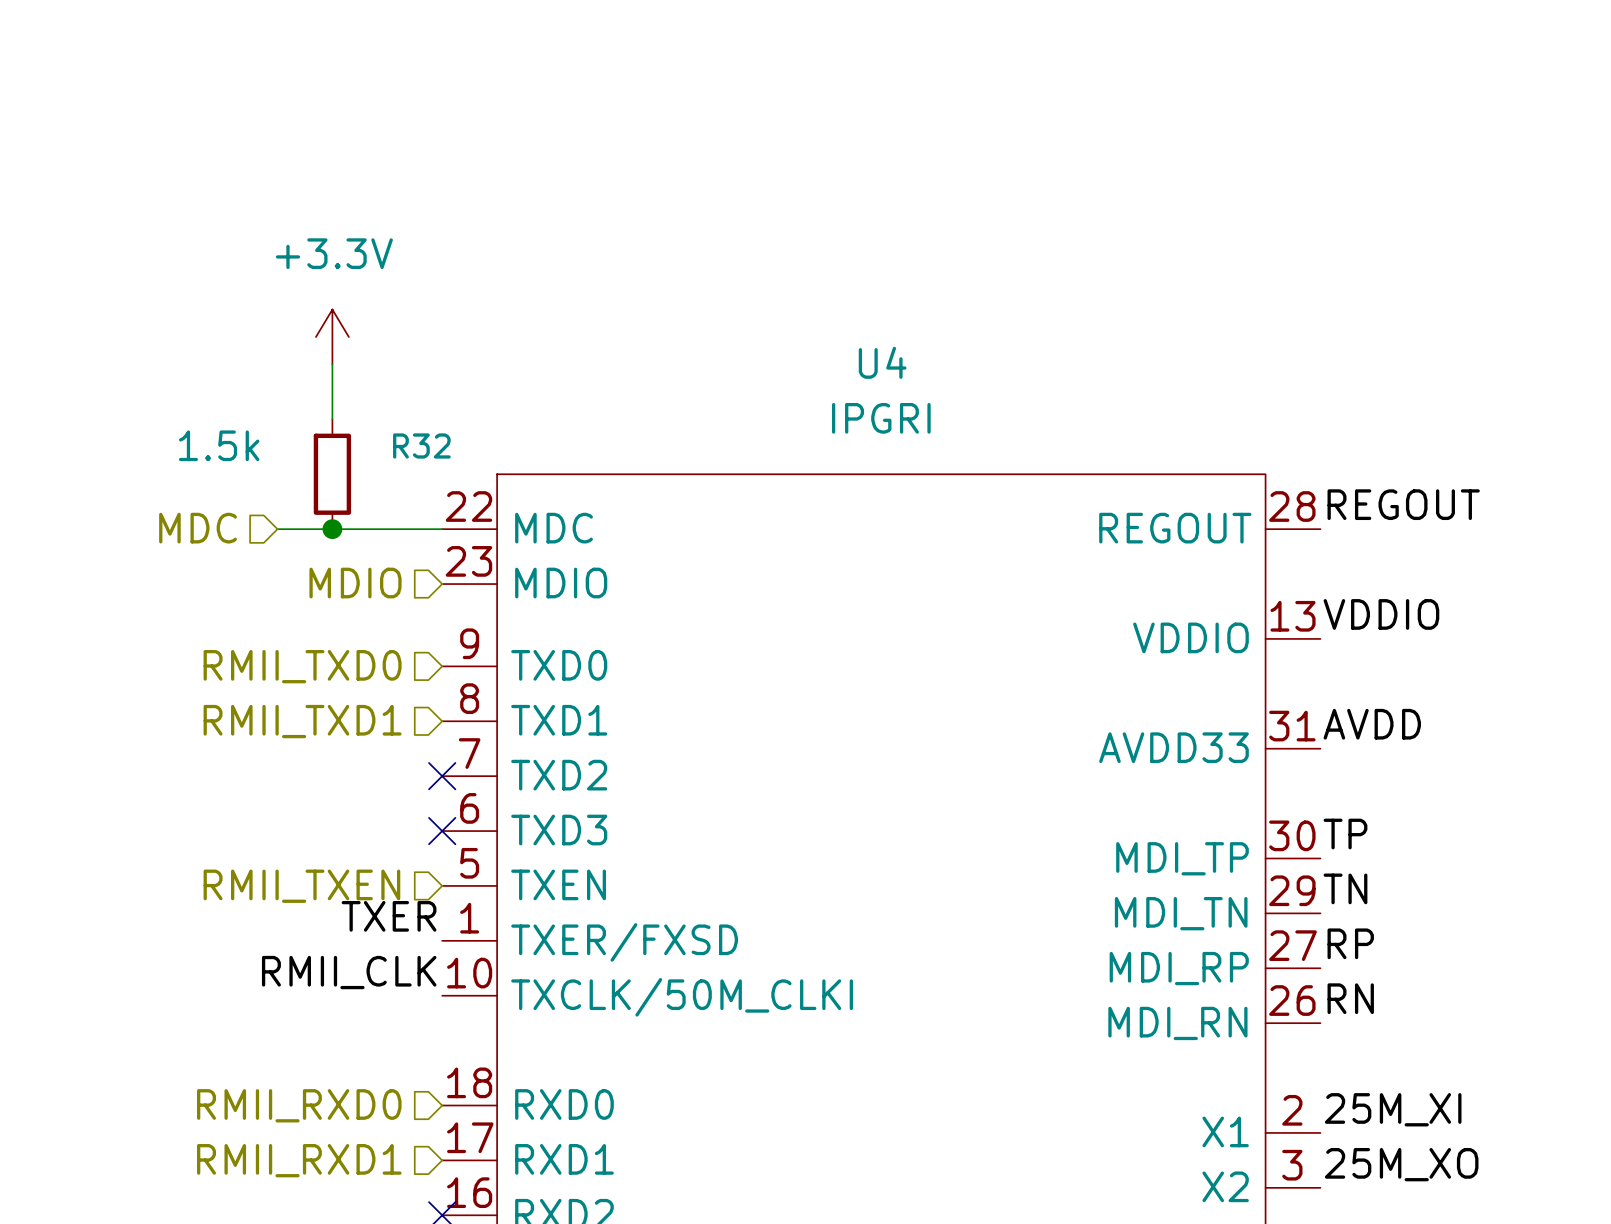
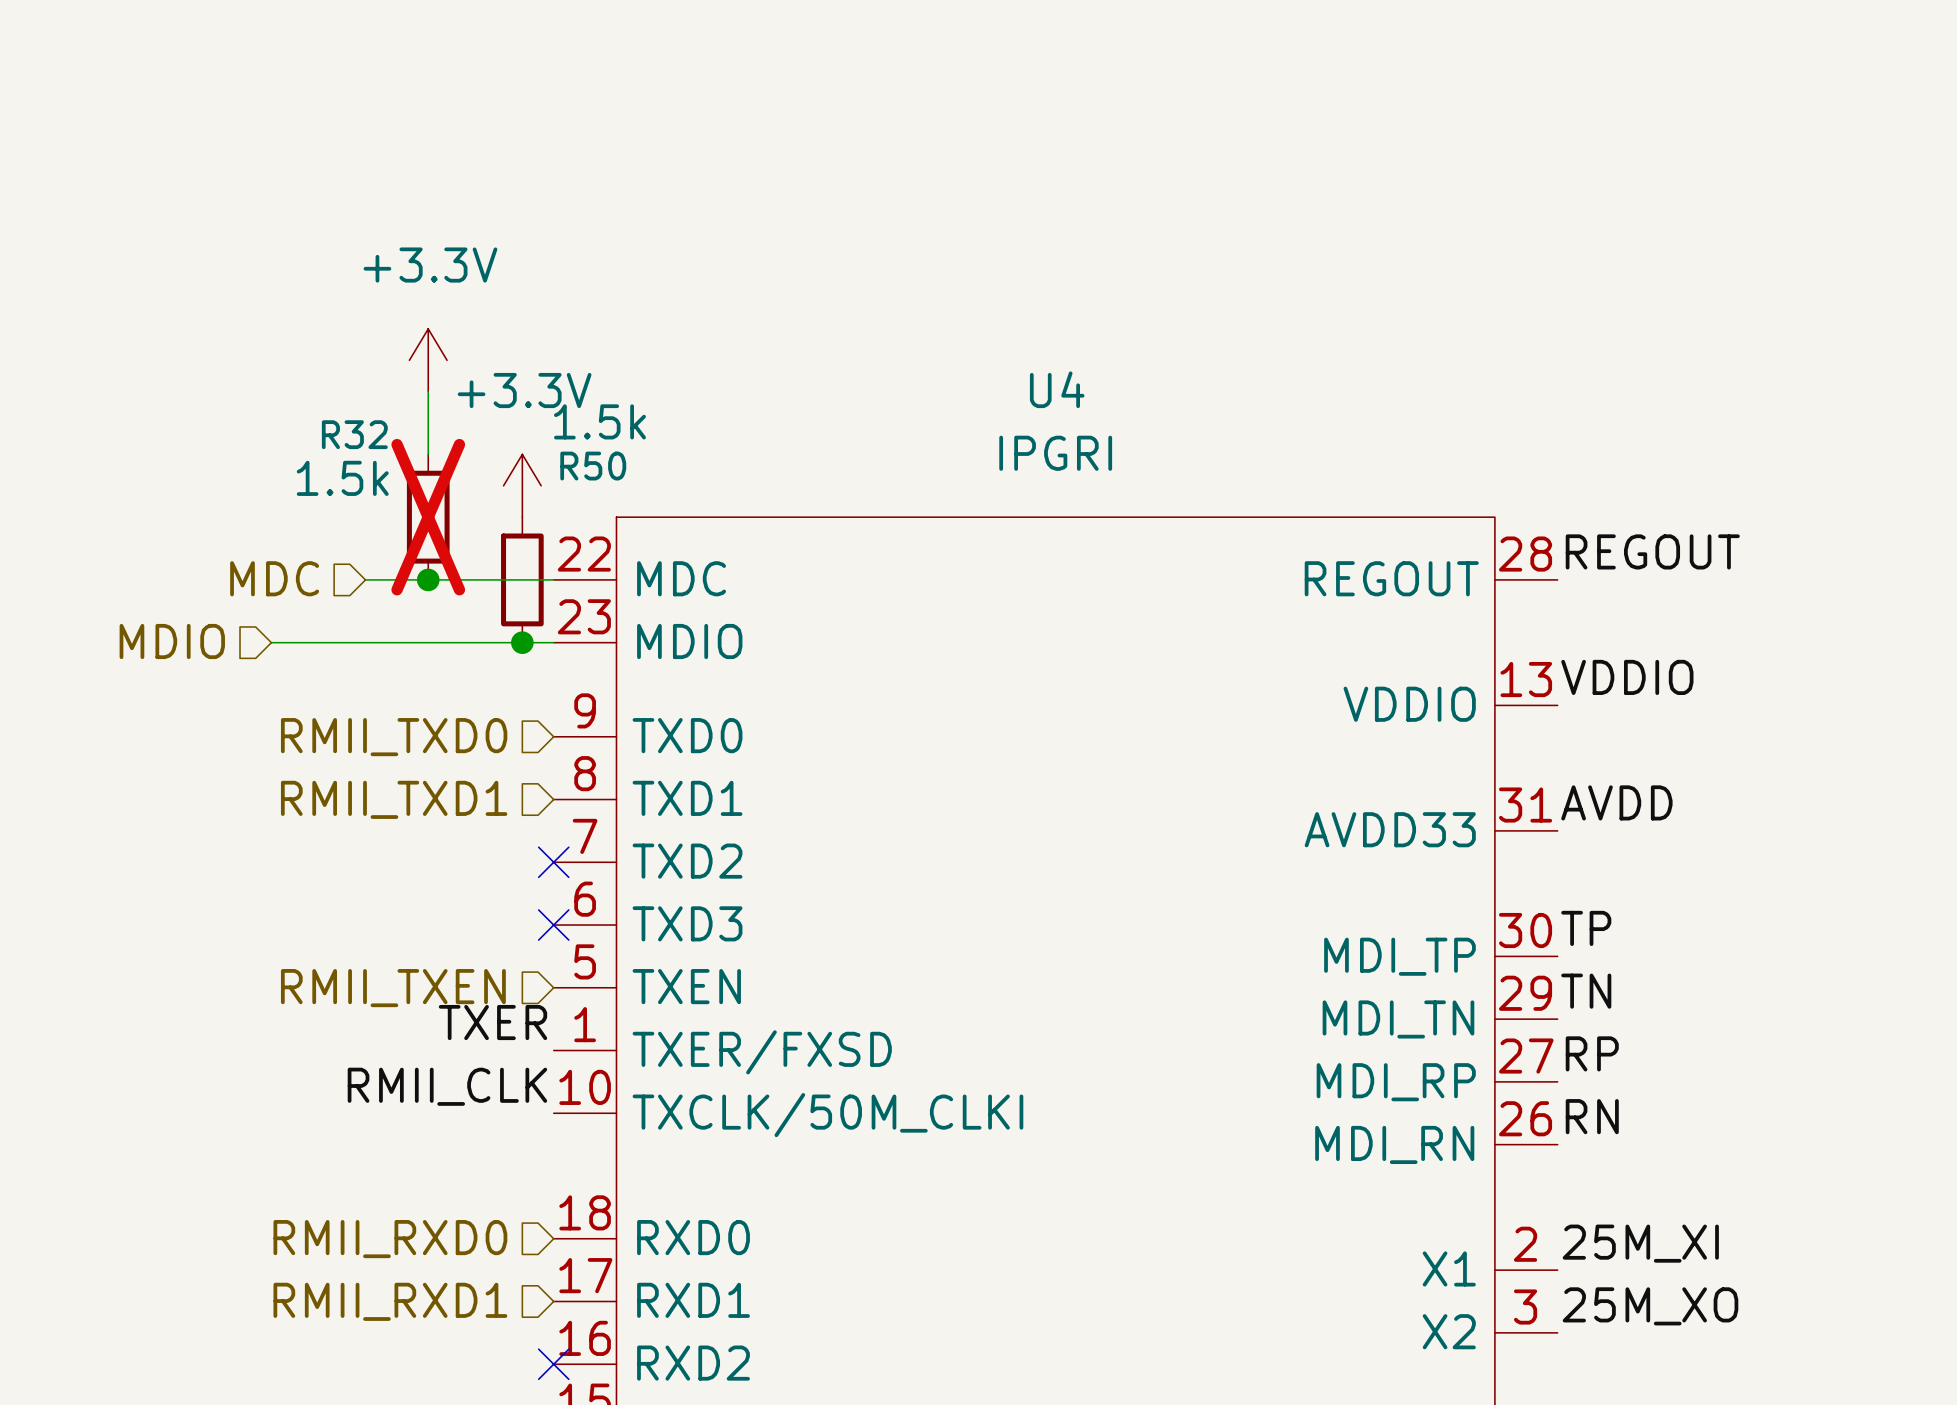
R32 value position: 1.5k (219, 445) -> 1.5k (342, 478)
R32 name position: R32 (421, 445) -> R32 (354, 434)
power symbol: none -> +3.3V (522, 485)
R32 do-not-place cross: none -> (428, 517)
R50: none -> 1.5k (522, 579)
hierarchical label position: MDIO (355, 583) -> MDIO (172, 641)
wire: none -> (271, 642) (553, 642)
junction: none -> (522, 642)

